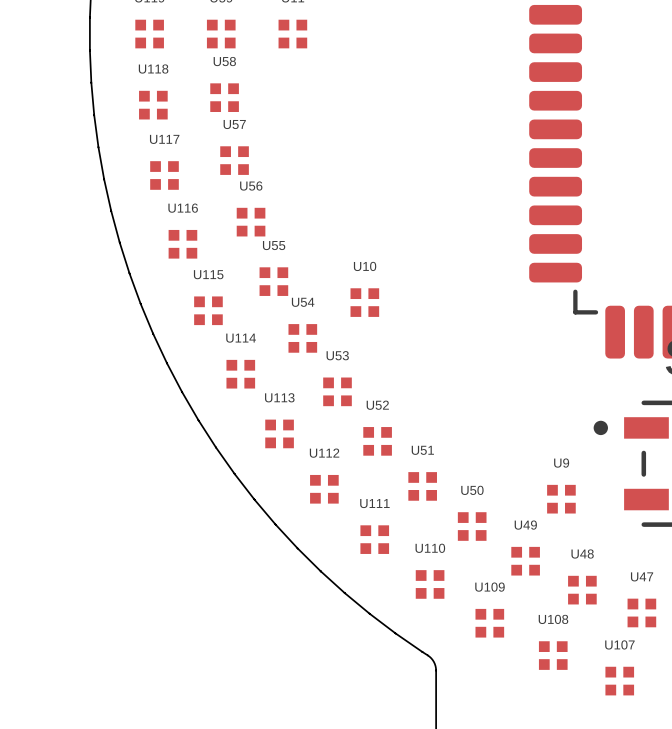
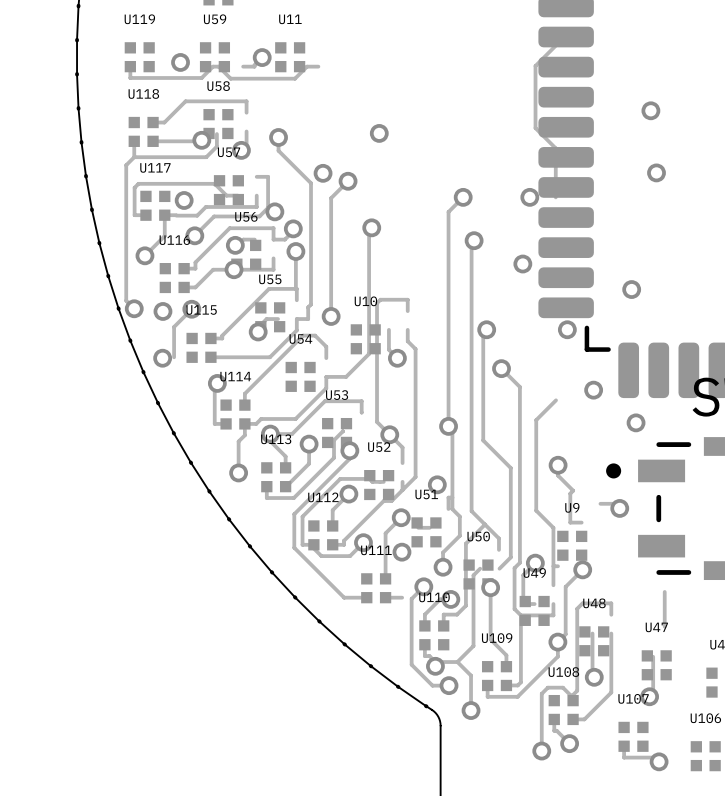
track: none -> (572, 38) (563, 38) (535, 65) (535, 128) (555, 148) (555, 197)
track: none -> (262, 57) (254, 66) (243, 66)
via: none -> (262, 57)
via: none -> (180, 62)
track: none -> (130, 66) (130, 77) (201, 77) (213, 66) (224, 66)
track: none -> (218, 66) (230, 78) (295, 78) (307, 66) (318, 66)
via: none -> (650, 110)
track: none -> (246, 112) (246, 101) (185, 101) (164, 122) (153, 122)
track: none -> (246, 131) (246, 145) (241, 150)
via: none -> (379, 133)
track: none -> (216, 134) (216, 146) (206, 157) (134, 157)
track: none -> (278, 137) (278, 150) (311, 183) (311, 304) (308, 307) (308, 319) (296, 319) (296, 330) (269, 357) (210, 357)
via: none -> (278, 137)
track: none -> (201, 140) (153, 141)
via: none -> (201, 140)
track: none -> (134, 141) (134, 157)
via: none -> (241, 150)
track: none -> (134, 157) (126, 165) (126, 300) (134, 308)
via: none -> (323, 173)
via: none -> (656, 172)
track: none -> (256, 176) (268, 176) (268, 207)
track: none -> (348, 181) (331, 198) (331, 316)
via: none -> (348, 181)
track: none -> (237, 195) (226, 195) (214, 183) (138, 183) (134, 187) (134, 215) (145, 215)
track: none -> (256, 195) (256, 206) (205, 206) (197, 215) (176, 215)
track: none -> (463, 197) (448, 211) (448, 426) (452, 430) (452, 509) (459, 516) (459, 535) (443, 552) (443, 567)
via: none -> (463, 197)
via: none -> (529, 197)
via: none -> (184, 200)
track: none -> (268, 207) (259, 216) (214, 216) (194, 235)
via: none -> (274, 211)
track: none -> (176, 215) (164, 215) (164, 235) (144, 255)
track: none -> (371, 227) (369, 230) (369, 353) (346, 376) (326, 376) (326, 388) (295, 418) (261, 418) (256, 423) (244, 423) (244, 435) (238, 441) (238, 472)
via: none -> (371, 227)
track: none -> (293, 228) (284, 239) (273, 239) (273, 228) (229, 228) (195, 262) (195, 268) (184, 268)
via: none -> (293, 228)
via: none -> (194, 235)
track: none -> (254, 239) (243, 239) (235, 245)
track: none -> (474, 240) (471, 243) (471, 511) (485, 524)
via: none -> (474, 240)
via: none -> (235, 245)
track: none -> (295, 251) (295, 288)
via: none -> (295, 251)
via: none -> (144, 255)
track: none -> (273, 258) (273, 269) (213, 269) (195, 287) (184, 287)
via: none -> (522, 264)
via: none -> (234, 269)
via: none -> (631, 289)
track: none -> (296, 300) (296, 288) (269, 288) (222, 335) (222, 338) (210, 338)
via: none -> (134, 308)
track: none -> (191, 309) (174, 326) (174, 357)
via: none -> (191, 309)
track: none -> (407, 311) (407, 299) (380, 299) (377, 303) (377, 421) (402, 447) (402, 463)
via: none -> (162, 311)
via: none -> (331, 316)
track: none -> (278, 319) (266, 319) (258, 327) (258, 331)
track: none -> (388, 329) (388, 349) (397, 358)
track: none -> (407, 329) (407, 341) (415, 349) (415, 477) (402, 490)
track: none -> (486, 329) (483, 333) (483, 440) (510, 468) (510, 557) (499, 568)
via: none -> (486, 329)
via: none -> (567, 329)
via: none -> (258, 331)
via: none -> (162, 358)
track: none -> (326, 358) (326, 346) (315, 335) (303, 335) (244, 393) (244, 405)
via: none -> (397, 358)
track: none -> (501, 368) (519, 387) (519, 562) (514, 568) (514, 609) (520, 615)
via: none -> (501, 368)
track: none -> (217, 383) (214, 386) (214, 423) (226, 423)
via: none -> (217, 383)
via: none -> (593, 390)
track: none -> (556, 400) (536, 420) (536, 510) (553, 527) (553, 585)
track: none -> (361, 412) (361, 401) (324, 401) (292, 434) (270, 434) (270, 441) (285, 456) (285, 467)
via: none -> (636, 422)
via: none -> (448, 426)
track: none -> (342, 431) (334, 440) (334, 457) (293, 498) (266, 498) (266, 486)
via: none -> (270, 434)
via: none -> (389, 434)
track: none -> (309, 444) (309, 463) (286, 486)
via: none -> (309, 444)
track: none -> (349, 450) (349, 458) (294, 514) (294, 547) (344, 597) (366, 597)
via: none -> (349, 450)
track: none -> (558, 465) (558, 475) (573, 490) (570, 493) (570, 522) (581, 522)
via: none -> (558, 465)
via: none -> (238, 472)
track: none -> (383, 481) (372, 481) (369, 478) (340, 478) (302, 516) (302, 544) (313, 544)
track: none -> (402, 481) (402, 490)
via: none -> (437, 484)
track: none -> (402, 490) (391, 501) (383, 501) (344, 540) (344, 544) (332, 544)
track: none -> (348, 494) (332, 510) (332, 525)
via: none -> (348, 494)
track: none -> (452, 497) (448, 497) (448, 508)
track: none -> (600, 503) (615, 503) (619, 508)
via: none -> (619, 508)
track: none -> (401, 517) (385, 533) (385, 578)
via: none -> (401, 517)
track: none -> (485, 524) (498, 538) (498, 549)
track: none -> (485, 524) (465, 543) (465, 605) (457, 614) (443, 614) (443, 625)
track: none -> (418, 527) (429, 527)
track: none -> (363, 542) (350, 556) (321, 556) (310, 544)
via: none -> (363, 542)
via: none -> (401, 552)
track: none -> (535, 563) (523, 575) (523, 604) (534, 604)
via: none -> (535, 563)
track: none -> (553, 566) (557, 566)
via: none -> (443, 567)
track: none -> (480, 568) (473, 575) (473, 645) (457, 662)
track: none -> (582, 569) (565, 586) (565, 634) (557, 642) (557, 656) (517, 696) (487, 696) (487, 685)
via: none -> (582, 569)
track: none -> (423, 586) (411, 598) (411, 664) (432, 685) (449, 685)
via: none -> (423, 586)
track: none -> (490, 587) (490, 639) (506, 655) (506, 666)
via: none -> (490, 587)
track: none -> (664, 591) (664, 626)
track: none -> (385, 597) (402, 597)
track: none -> (450, 599) (440, 599) (424, 614) (424, 625)
via: none -> (450, 599)
track: none -> (553, 604) (553, 615) (520, 615)
track: none -> (611, 614) (611, 603) (582, 603) (577, 608) (577, 690) (573, 694) (573, 700)
track: none -> (520, 615) (520, 682) (517, 685) (506, 685)
track: none -> (592, 633) (592, 675) (594, 677)
track: none -> (611, 633) (611, 692) (584, 719) (573, 719)
via: none -> (557, 642)
track: none -> (424, 644) (424, 656) (429, 656) (435, 662)
track: none -> (653, 656) (653, 693) (649, 696)
track: none -> (435, 662) (457, 662)
track: none -> (457, 662) (471, 675) (471, 710)
via: none -> (435, 666)
via: none -> (594, 677)
via: none -> (449, 685)
via: none -> (649, 696)
track: none -> (573, 697) (562, 687) (547, 687) (541, 693) (541, 751)
via: none -> (471, 710)
track: none -> (554, 719) (554, 730) (556, 730) (569, 743)
via: none -> (569, 743)
track: none -> (624, 746) (624, 757) (654, 757) (659, 761)
via: none -> (541, 751)
via: none -> (659, 761)

